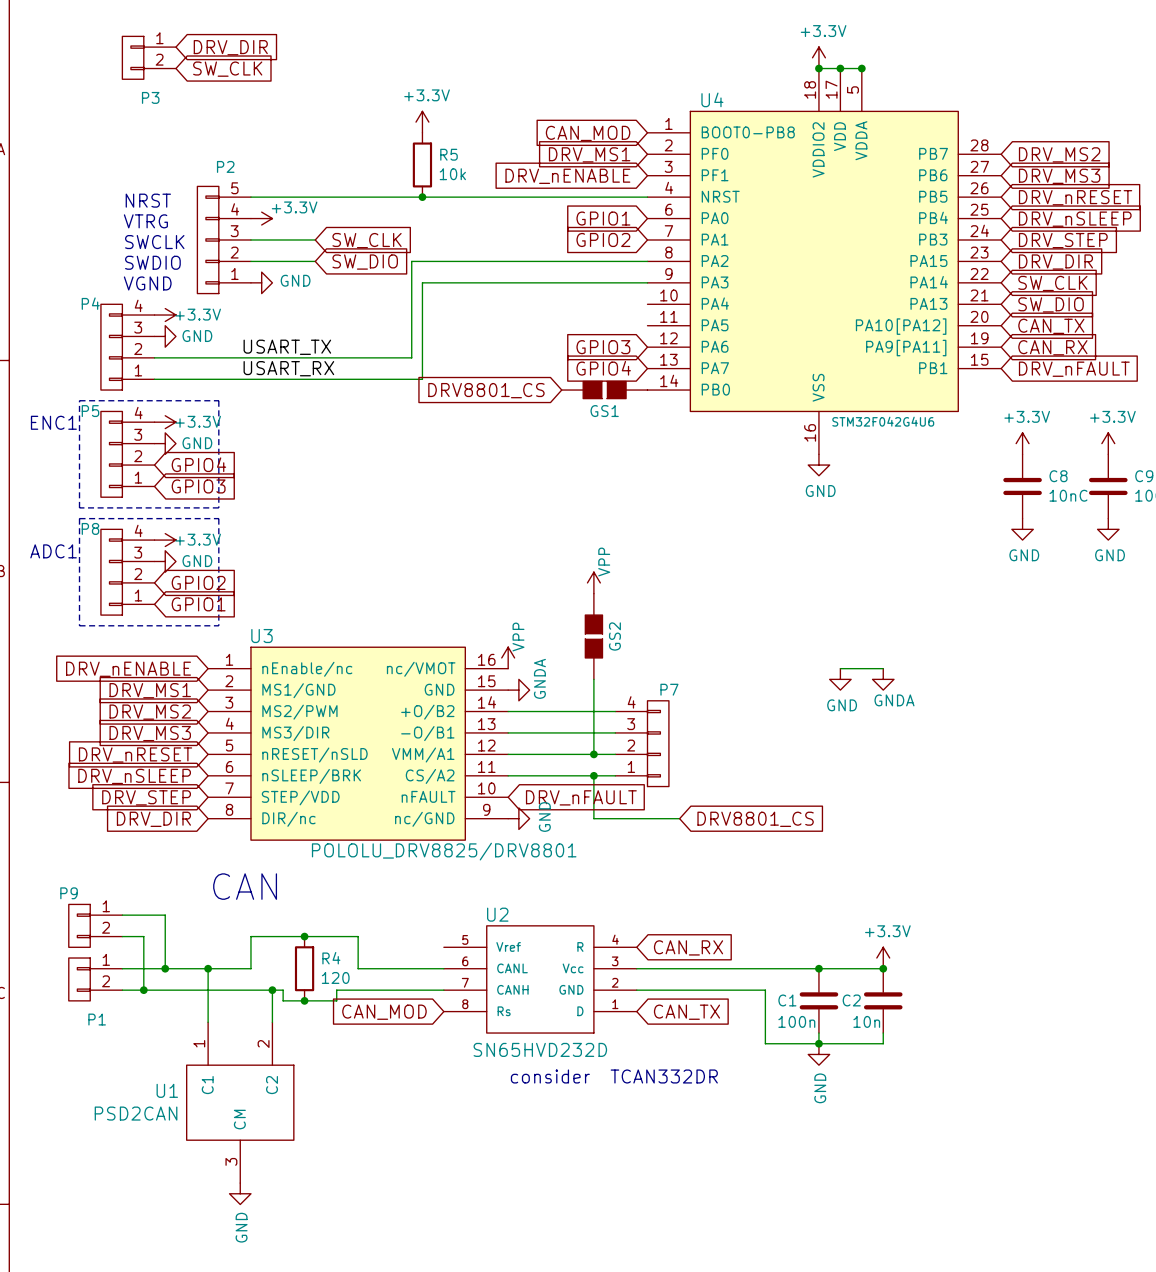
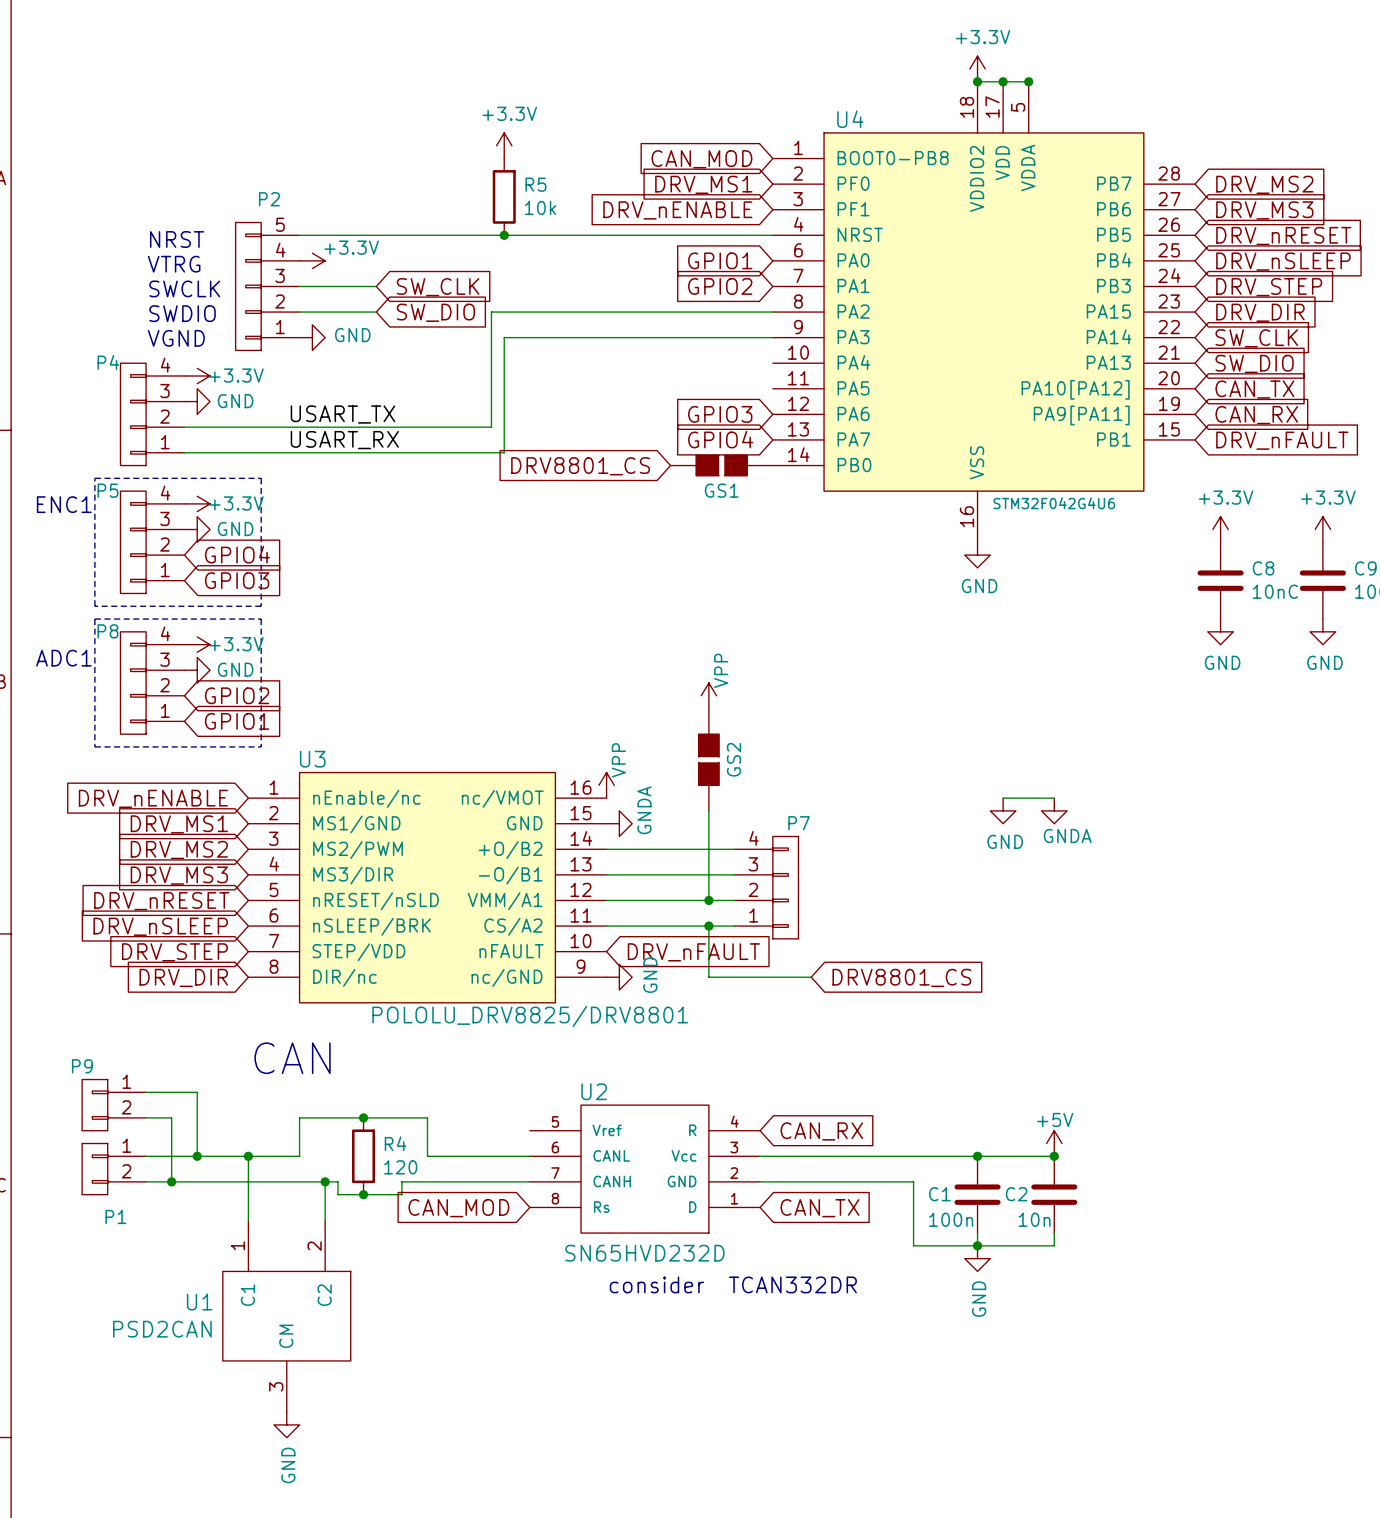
global label: DRV_DIR (230, 47) -> none
P3: (149, 57) -> none
global label: SW_CLK (227, 69) -> none
power symbol: +3.3V (883, 958) -> +5V (1054, 1143)

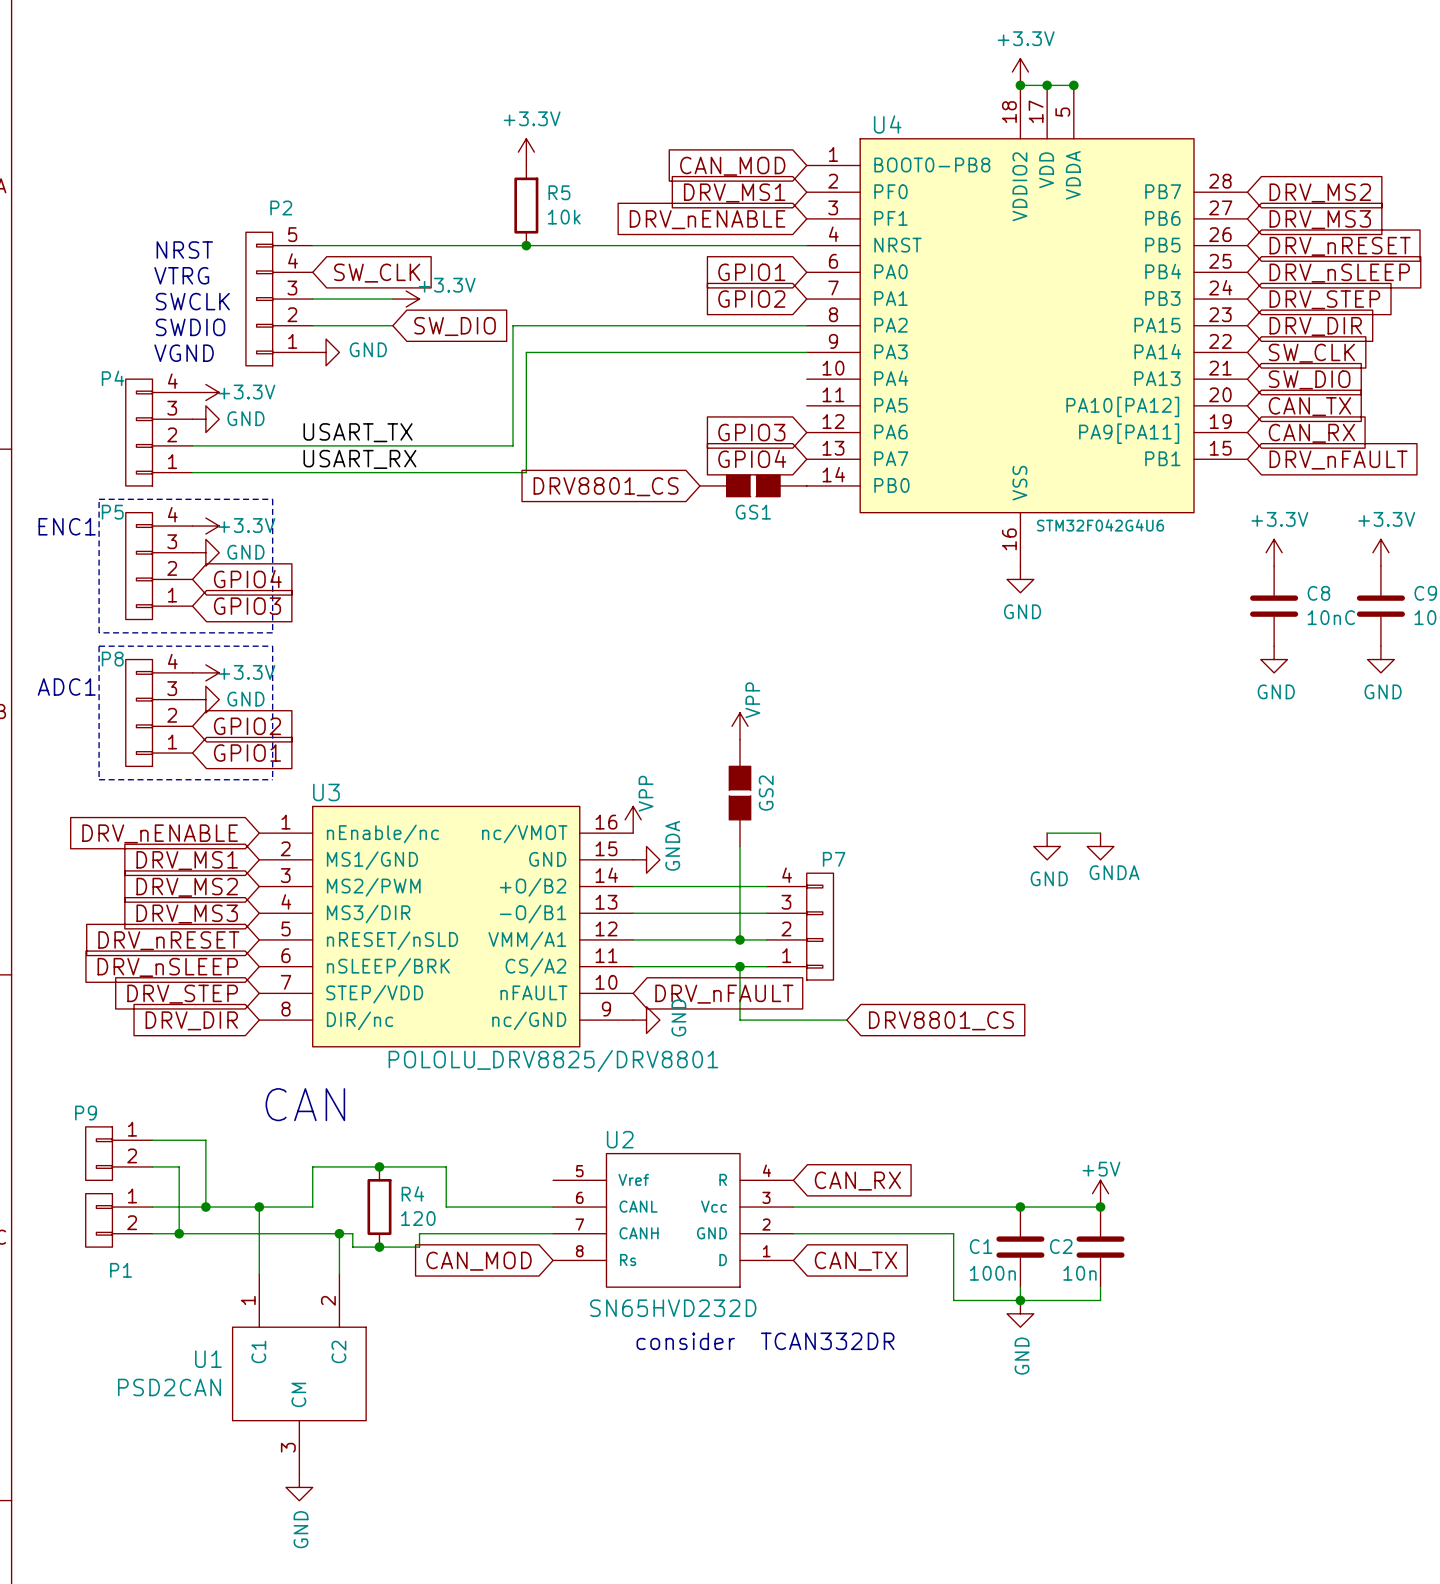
power symbol position: +3.3V (312, 260) -> +3.3V (406, 299)
global label position: SW_CLK (438, 287) -> SW_CLK (377, 273)

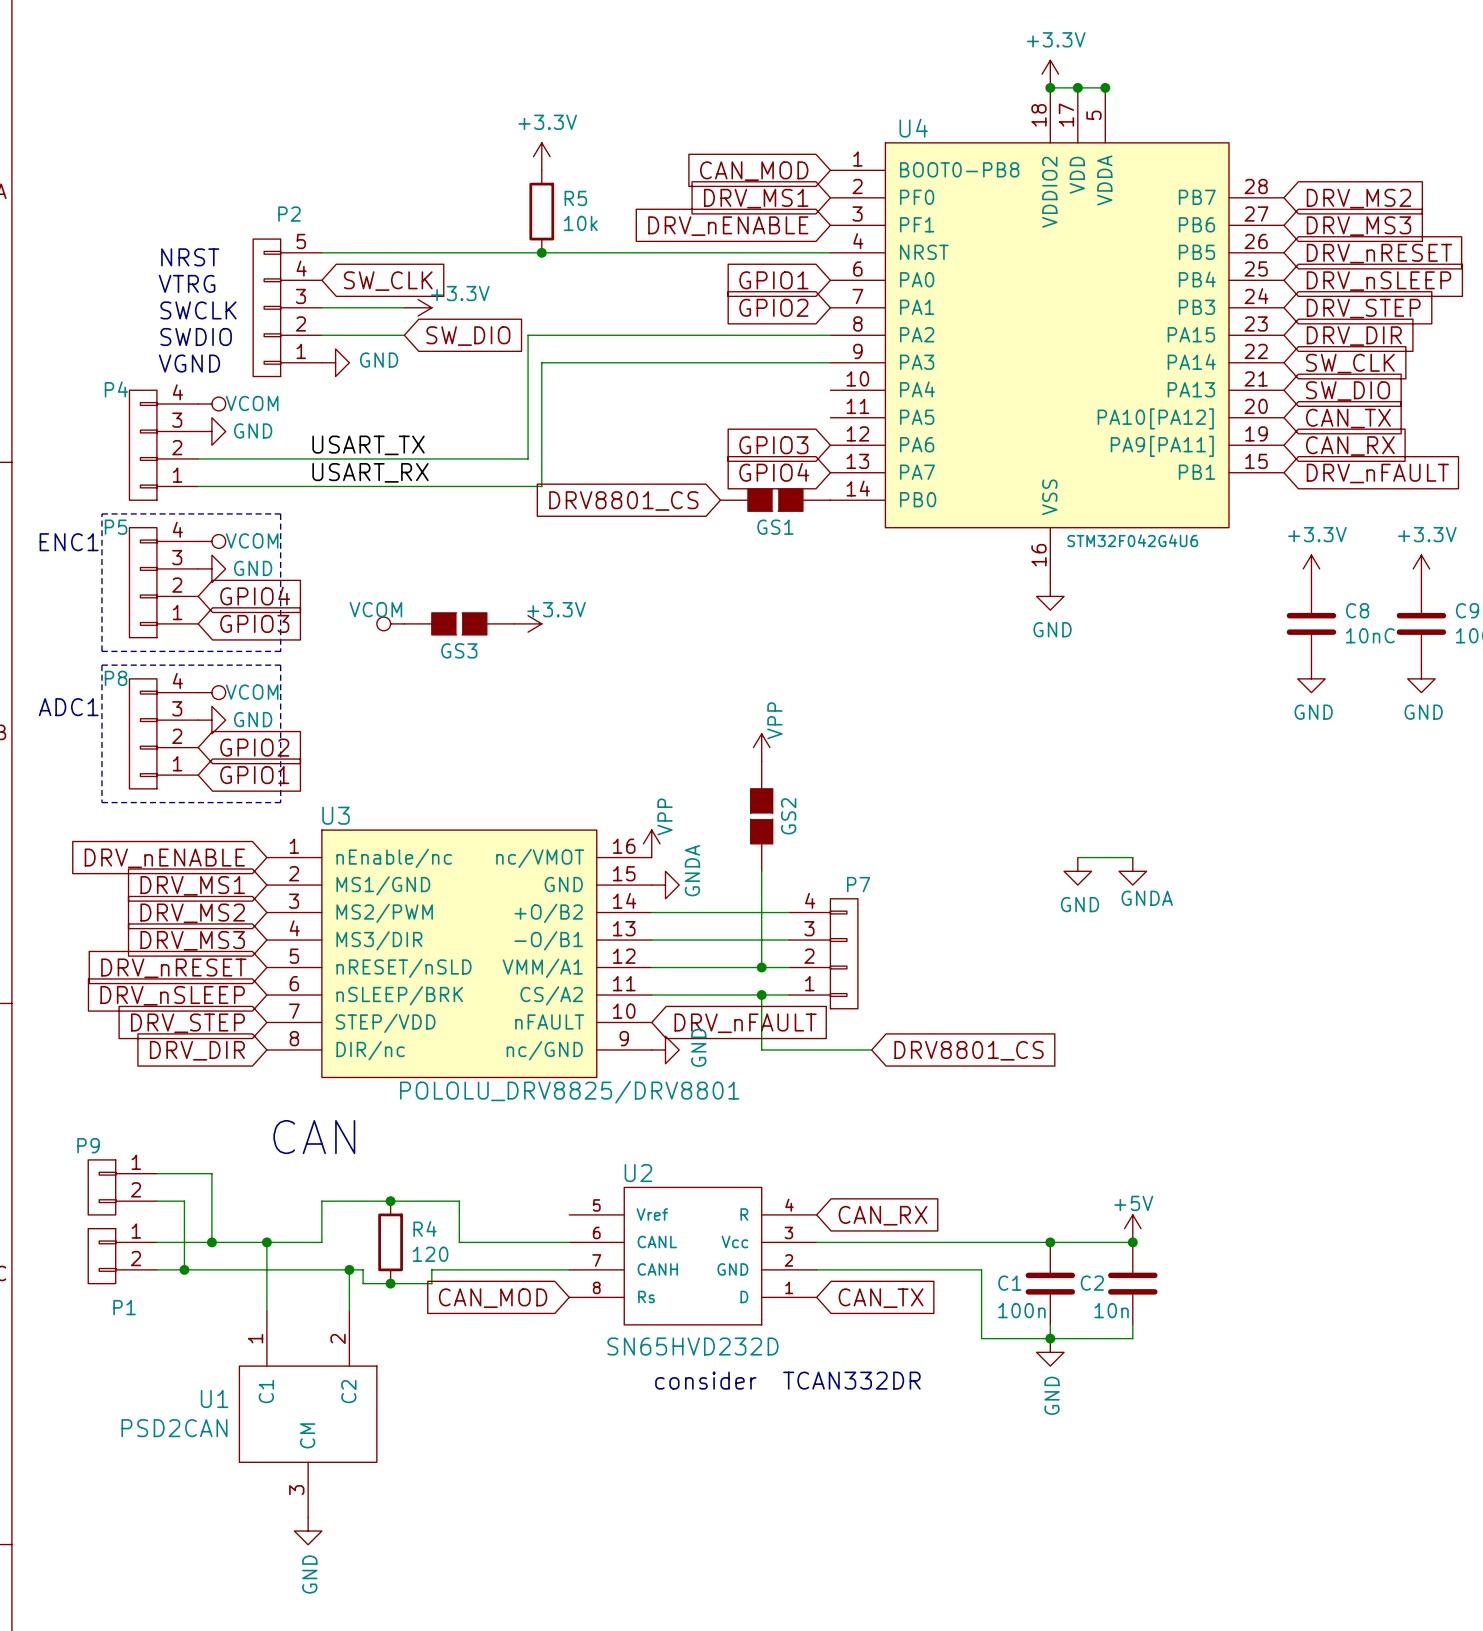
power symbol: +3.3V (205, 392) -> VCOM (211, 404)
power symbol: +3.3V (205, 526) -> VCOM (211, 541)
power symbol: none -> VCOM (390, 623)
GS3: none -> (459, 623)
power symbol: none -> +3.3V (528, 623)
power symbol: +3.3V (205, 672) -> VCOM (211, 692)

